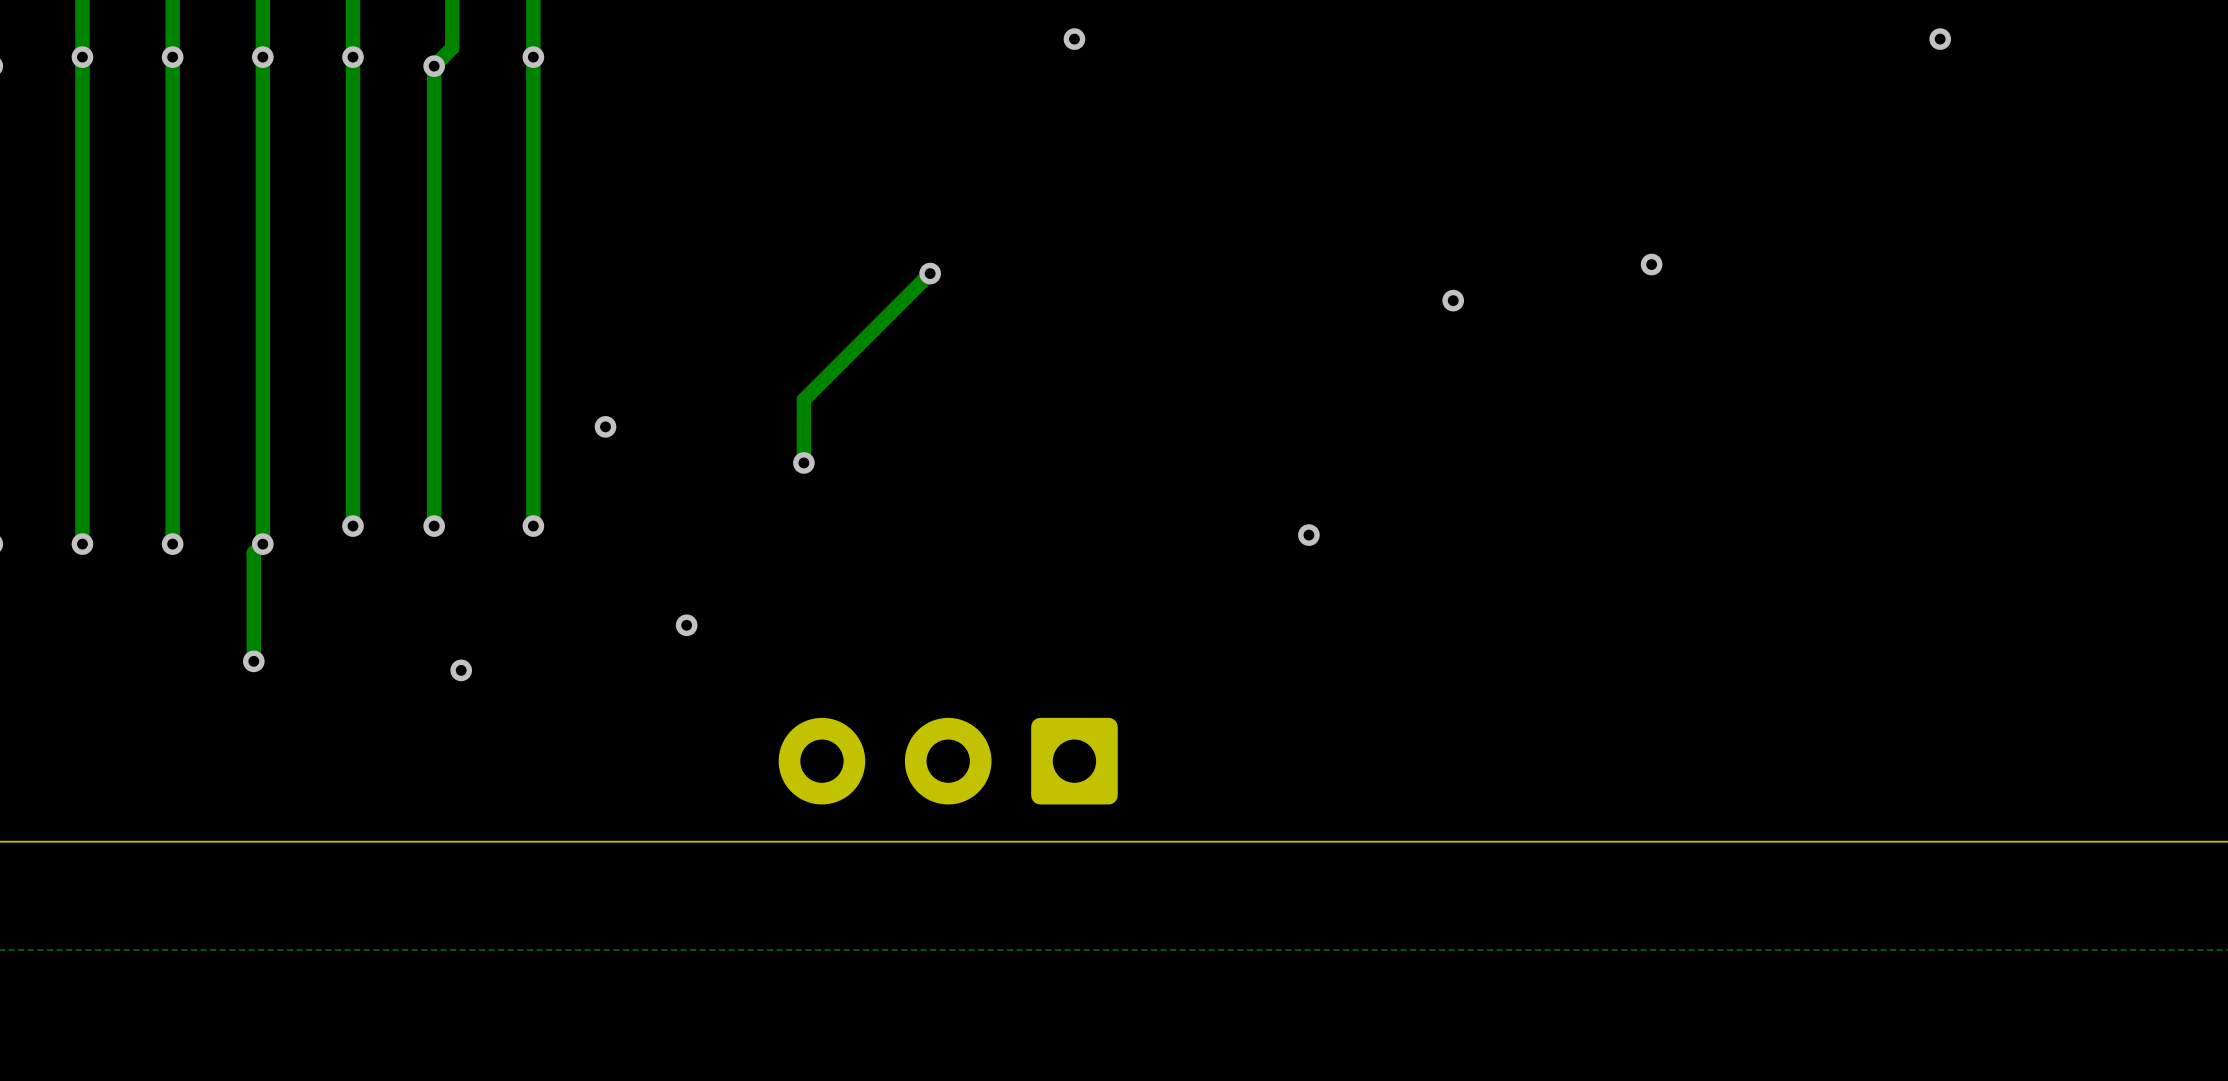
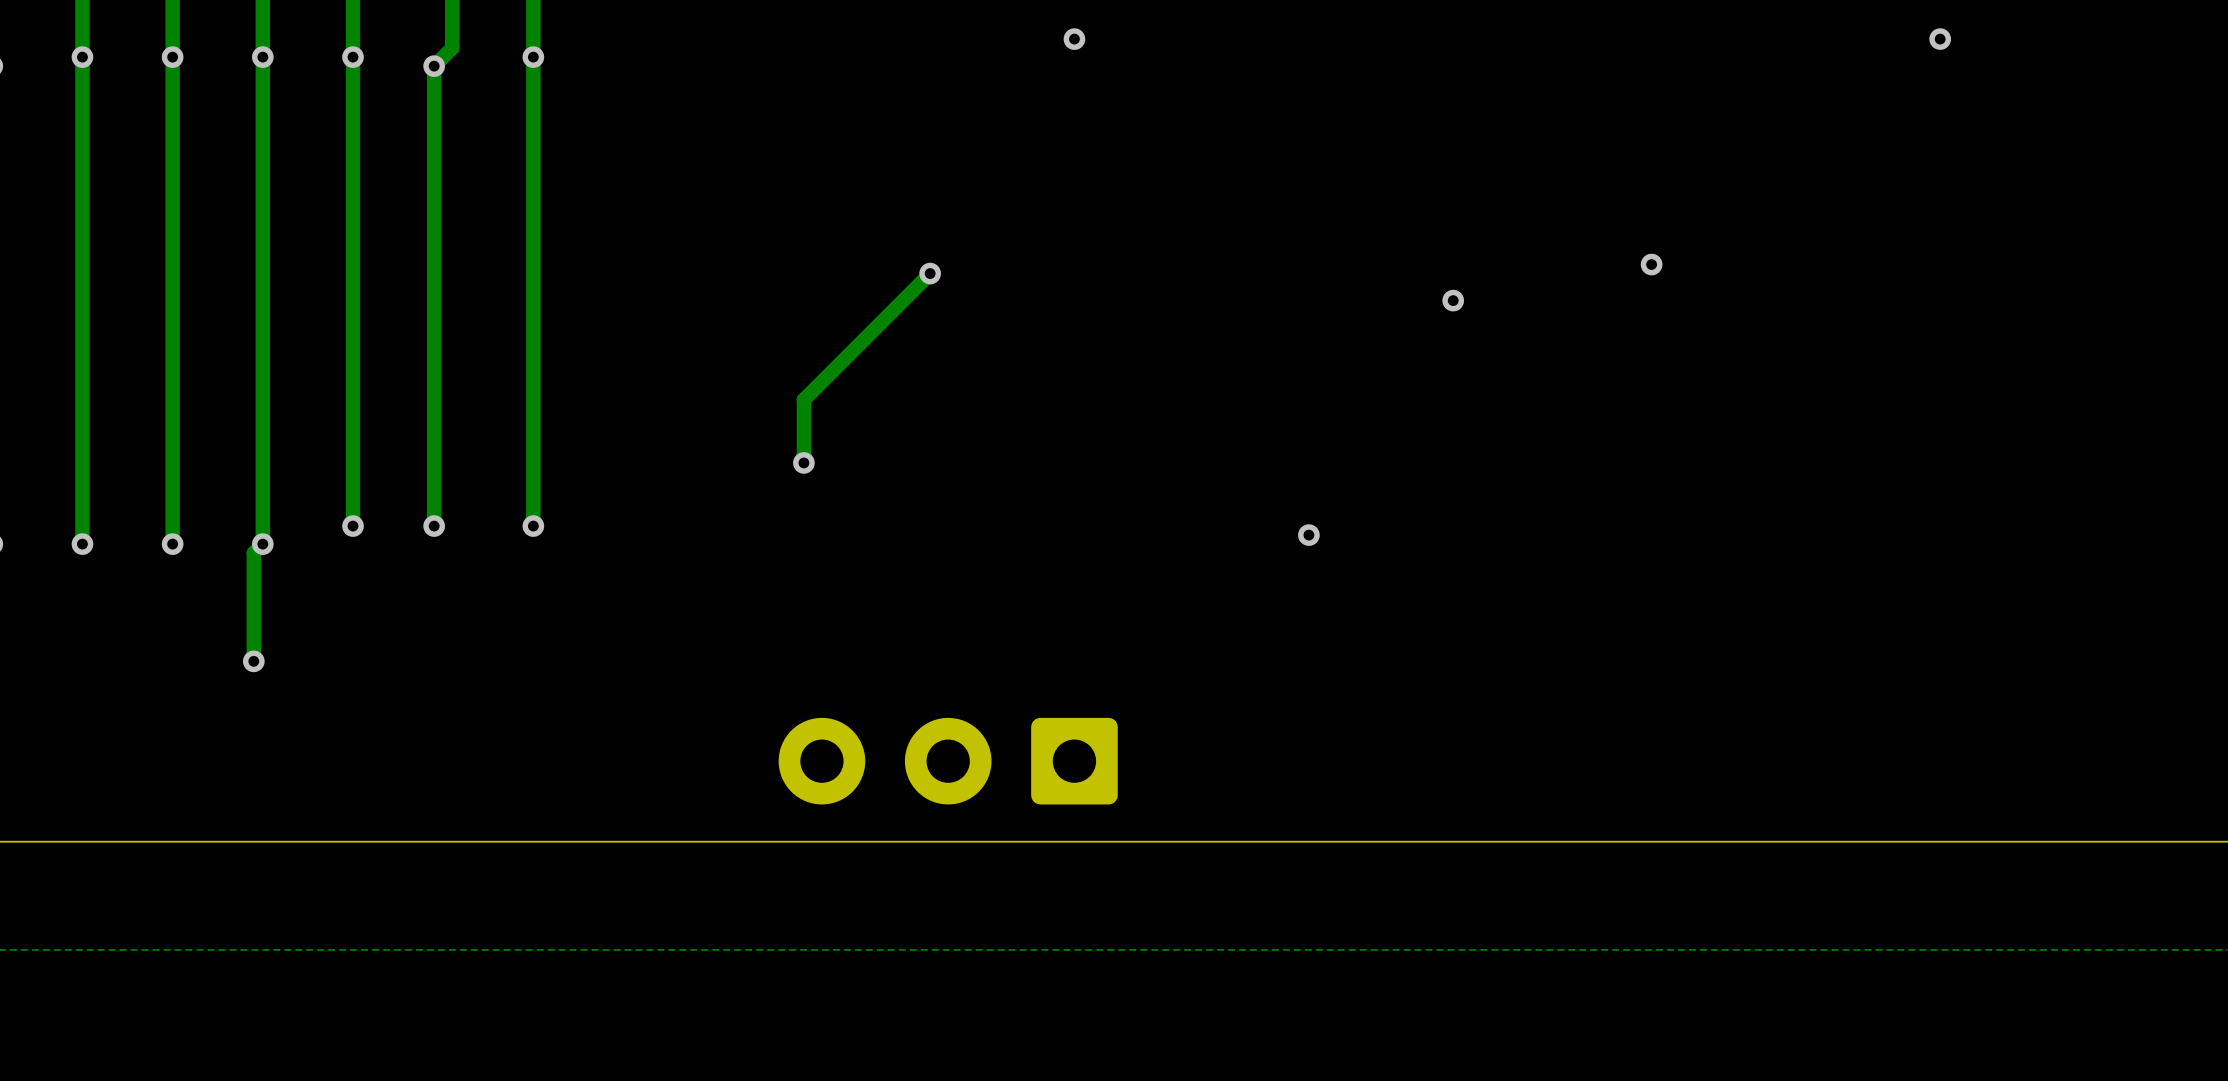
via: (605, 426) -> none
via: (686, 625) -> none
via: (461, 670) -> none

